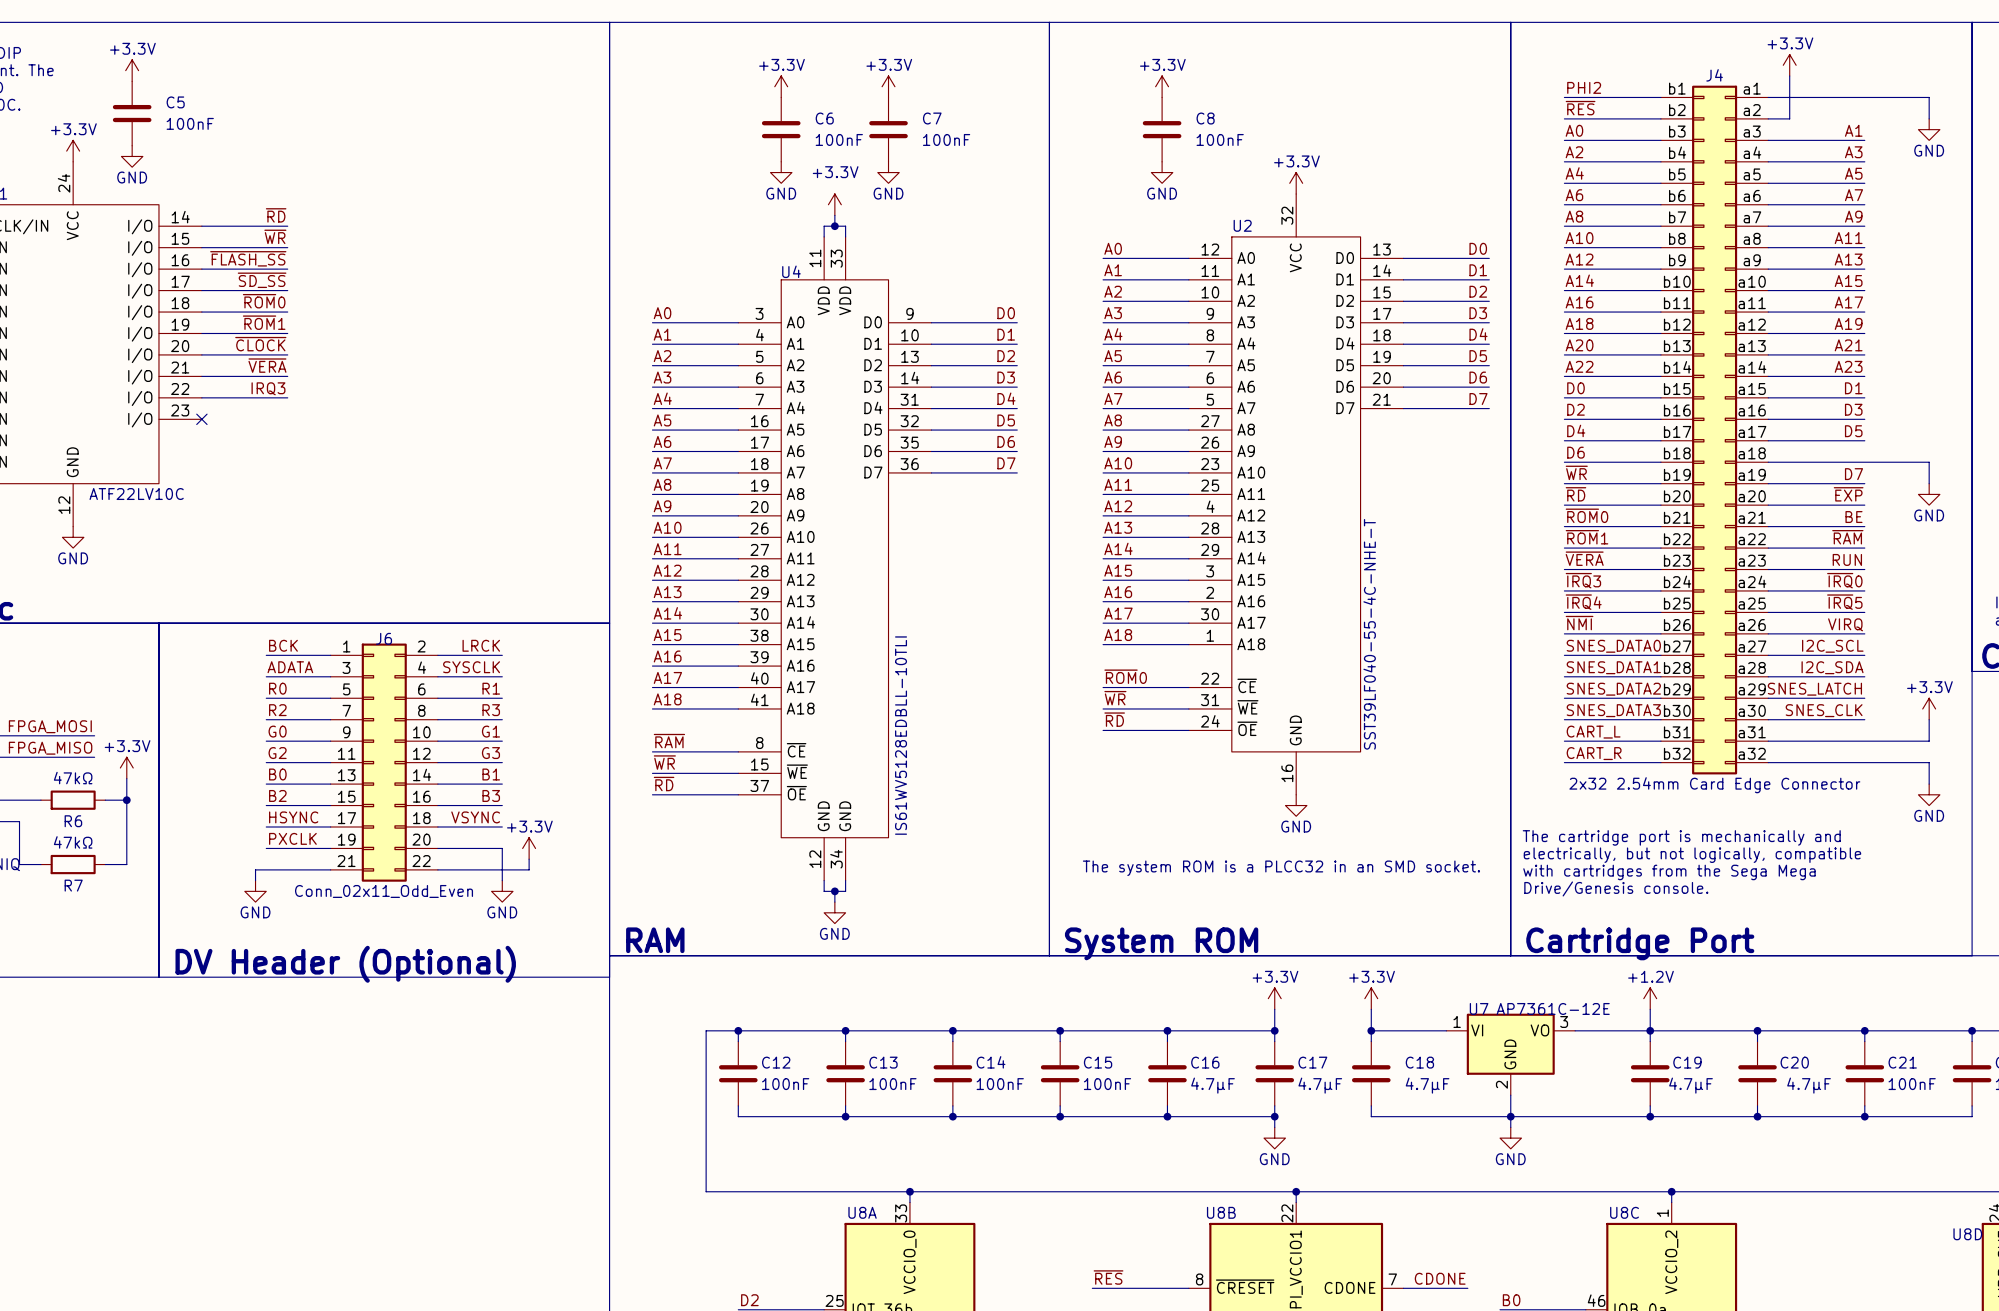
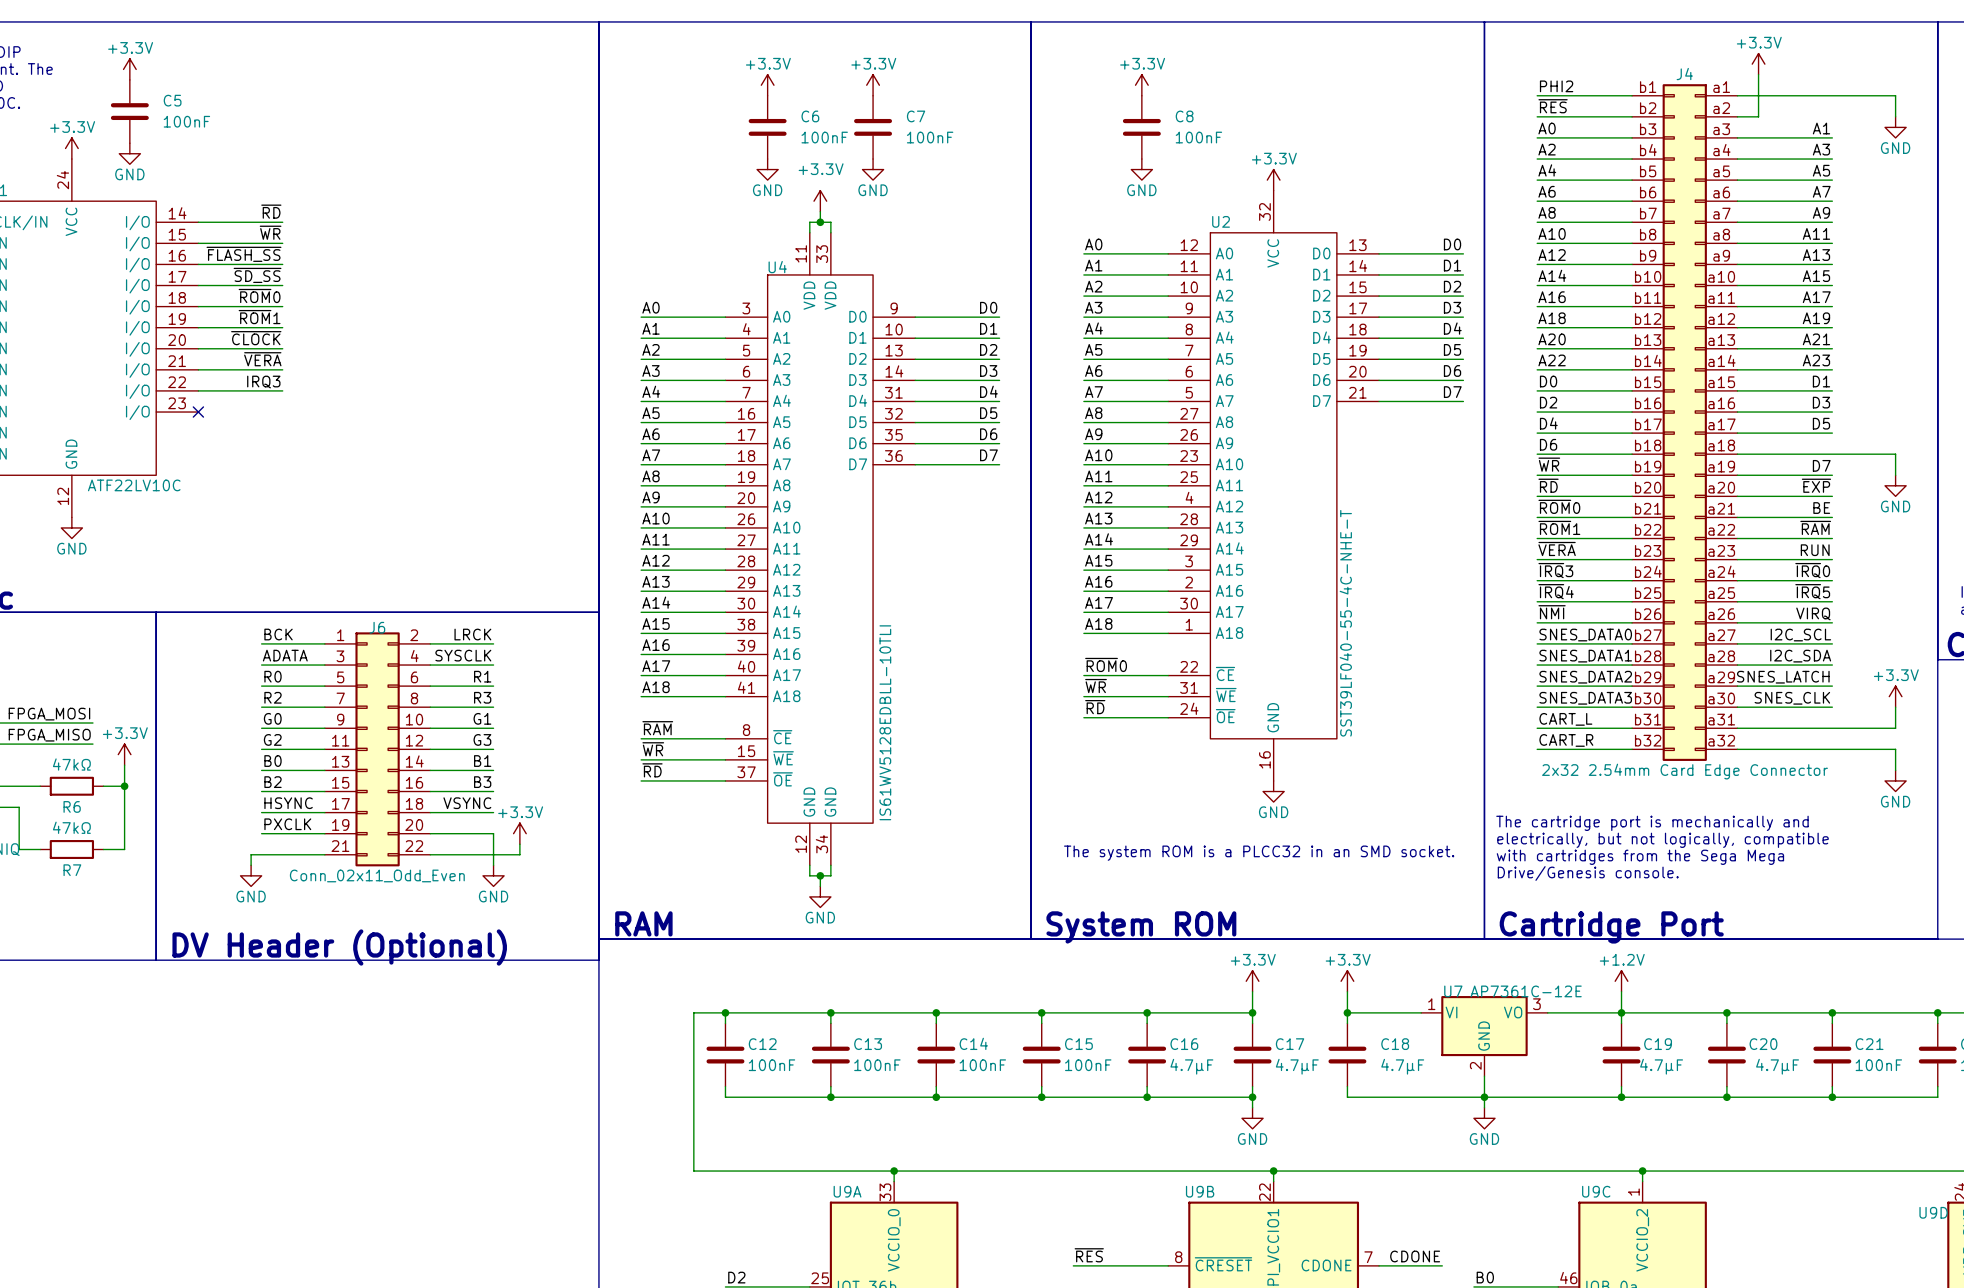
U8A name: U8A (862, 1212) -> U9A (847, 1191)
U8B name: U8B (1221, 1212) -> U9B (1200, 1191)
U8C name: U8C (1624, 1212) -> U9C (1596, 1191)
U8D name: U8D (1967, 1234) -> U9D (1933, 1212)

